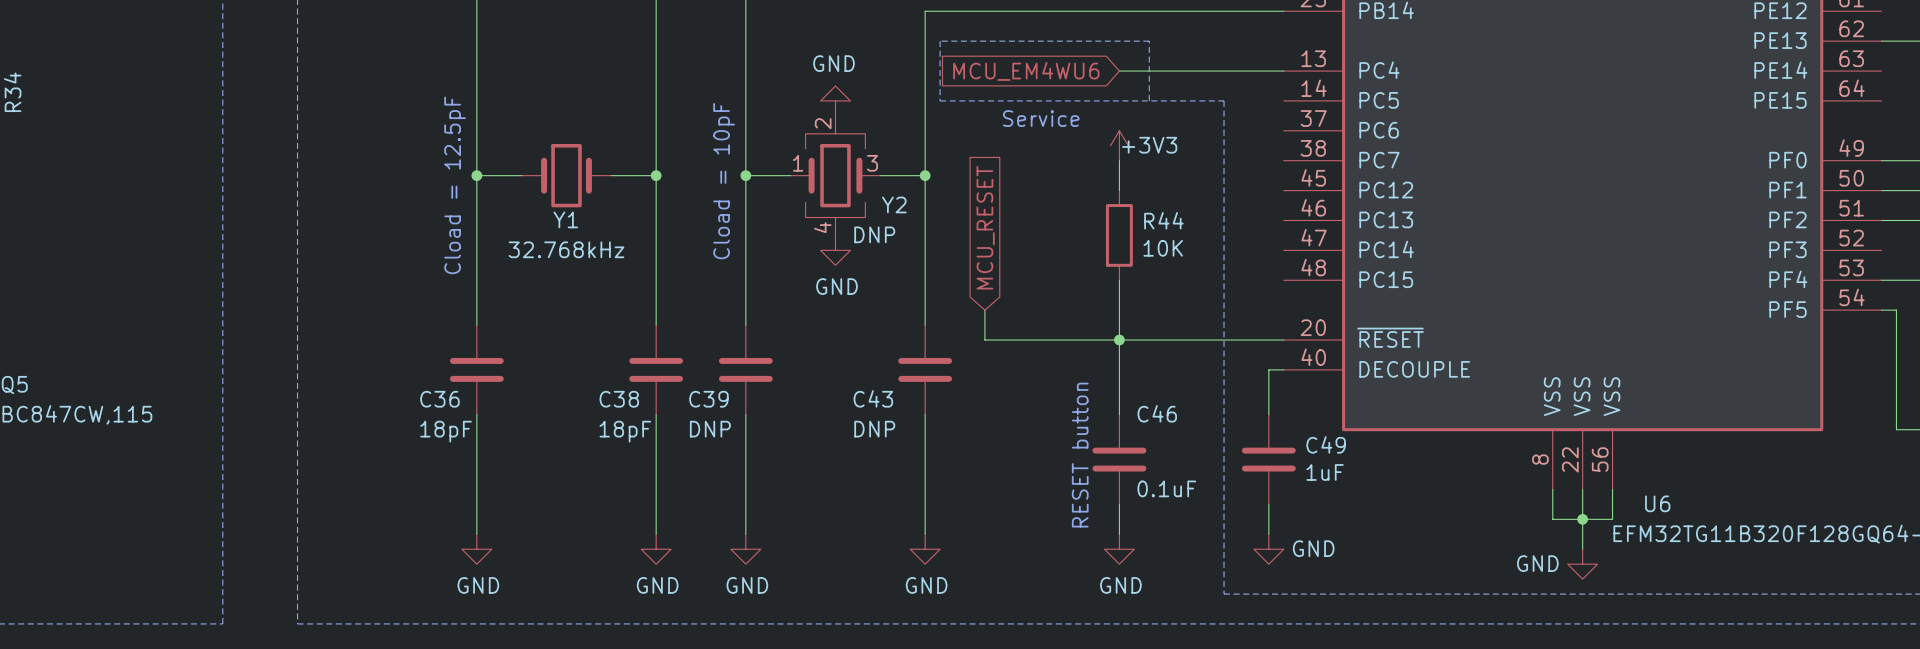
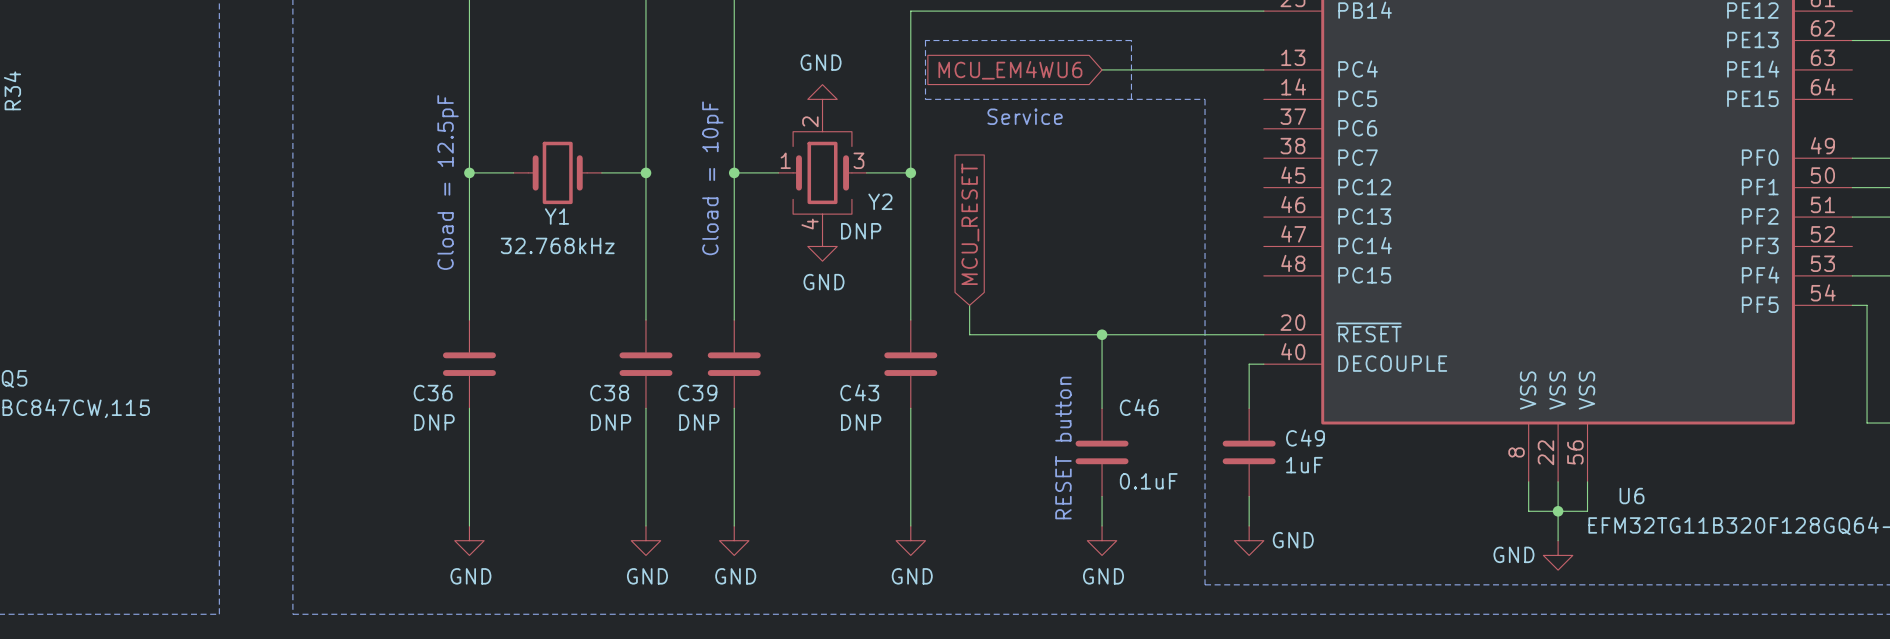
power symbol: +3V3 (1119, 145) -> none
wire: (1119, 160) (1119, 190) -> none
R44: 10K (1119, 235) -> none
wire: (1119, 280) (1119, 340) -> none
C36 value: 18pF (446, 431) -> DNP (434, 422)
C38 value: 18pF (625, 431) -> DNP (611, 422)

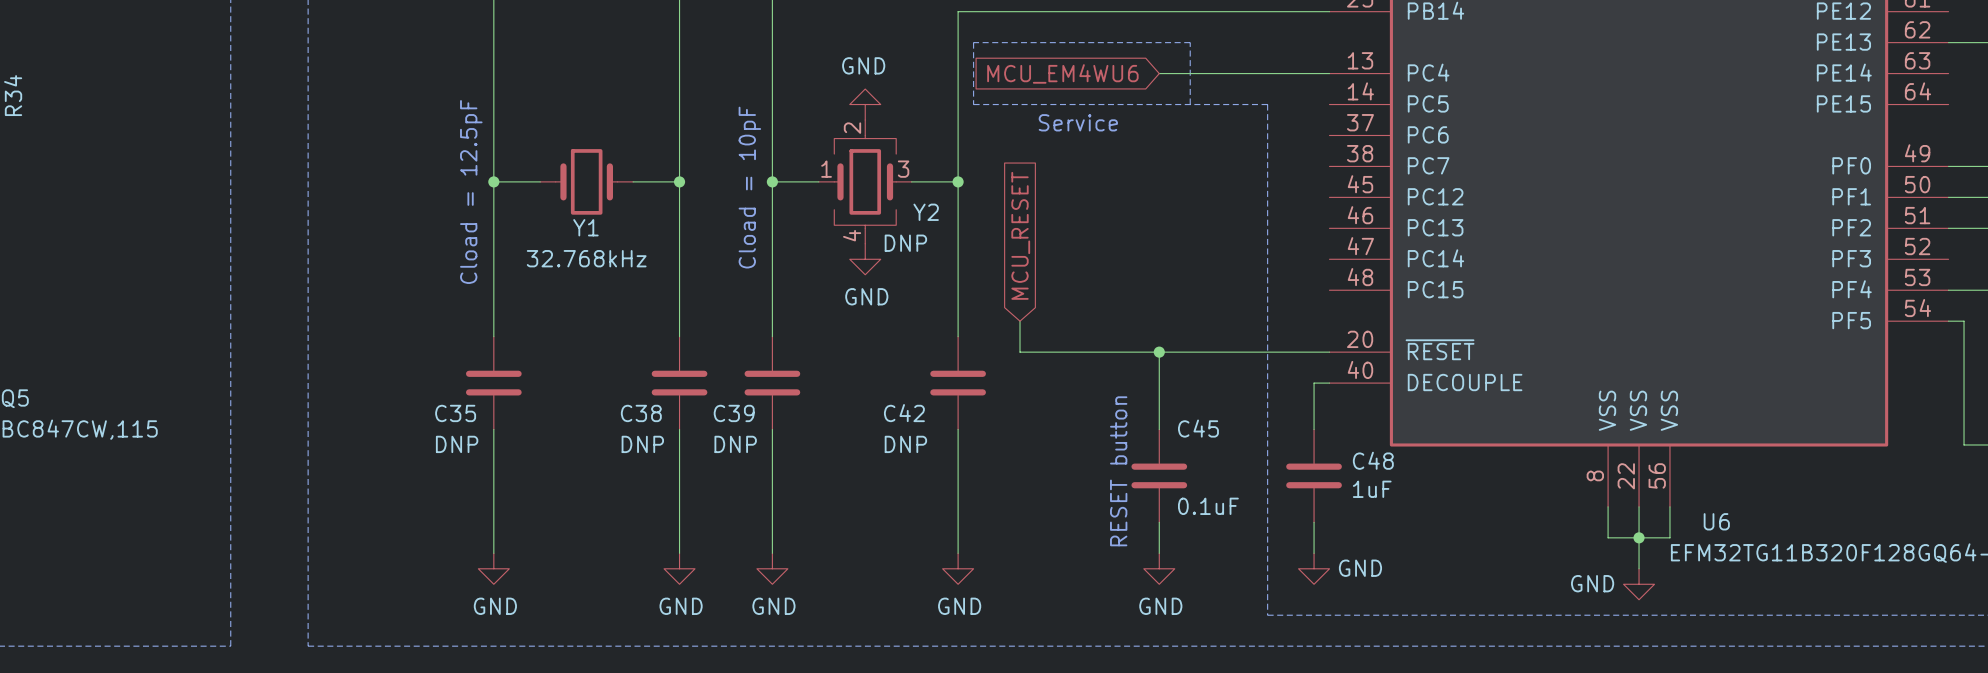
C43 name: C43 (859, 392) -> C42 (904, 413)
C36 name: C36 (433, 393) -> C35 (455, 413)
C46 name: C46 (1139, 407) -> C45 (1198, 428)
C49 name: C49 (1305, 438) -> C48 (1373, 460)

